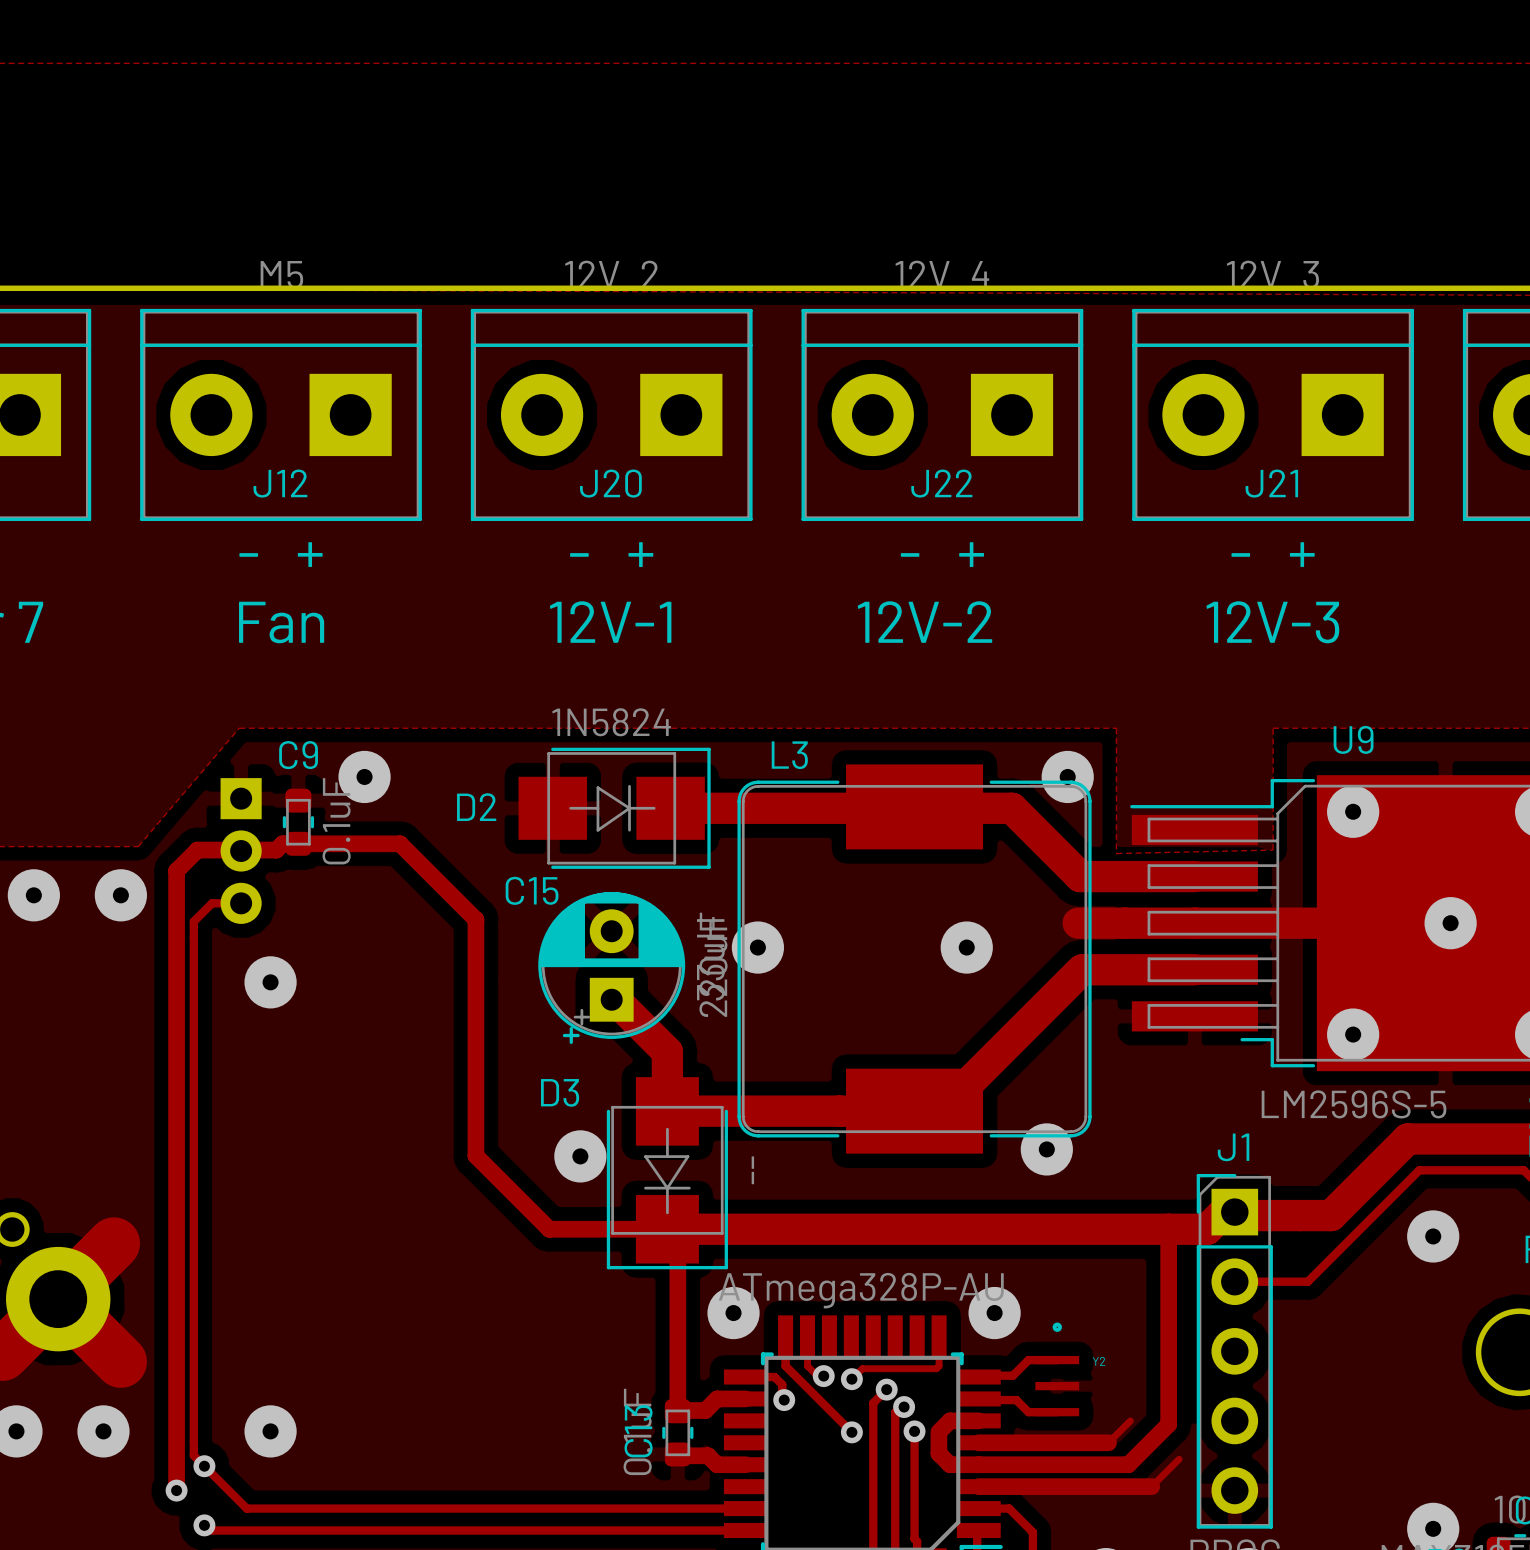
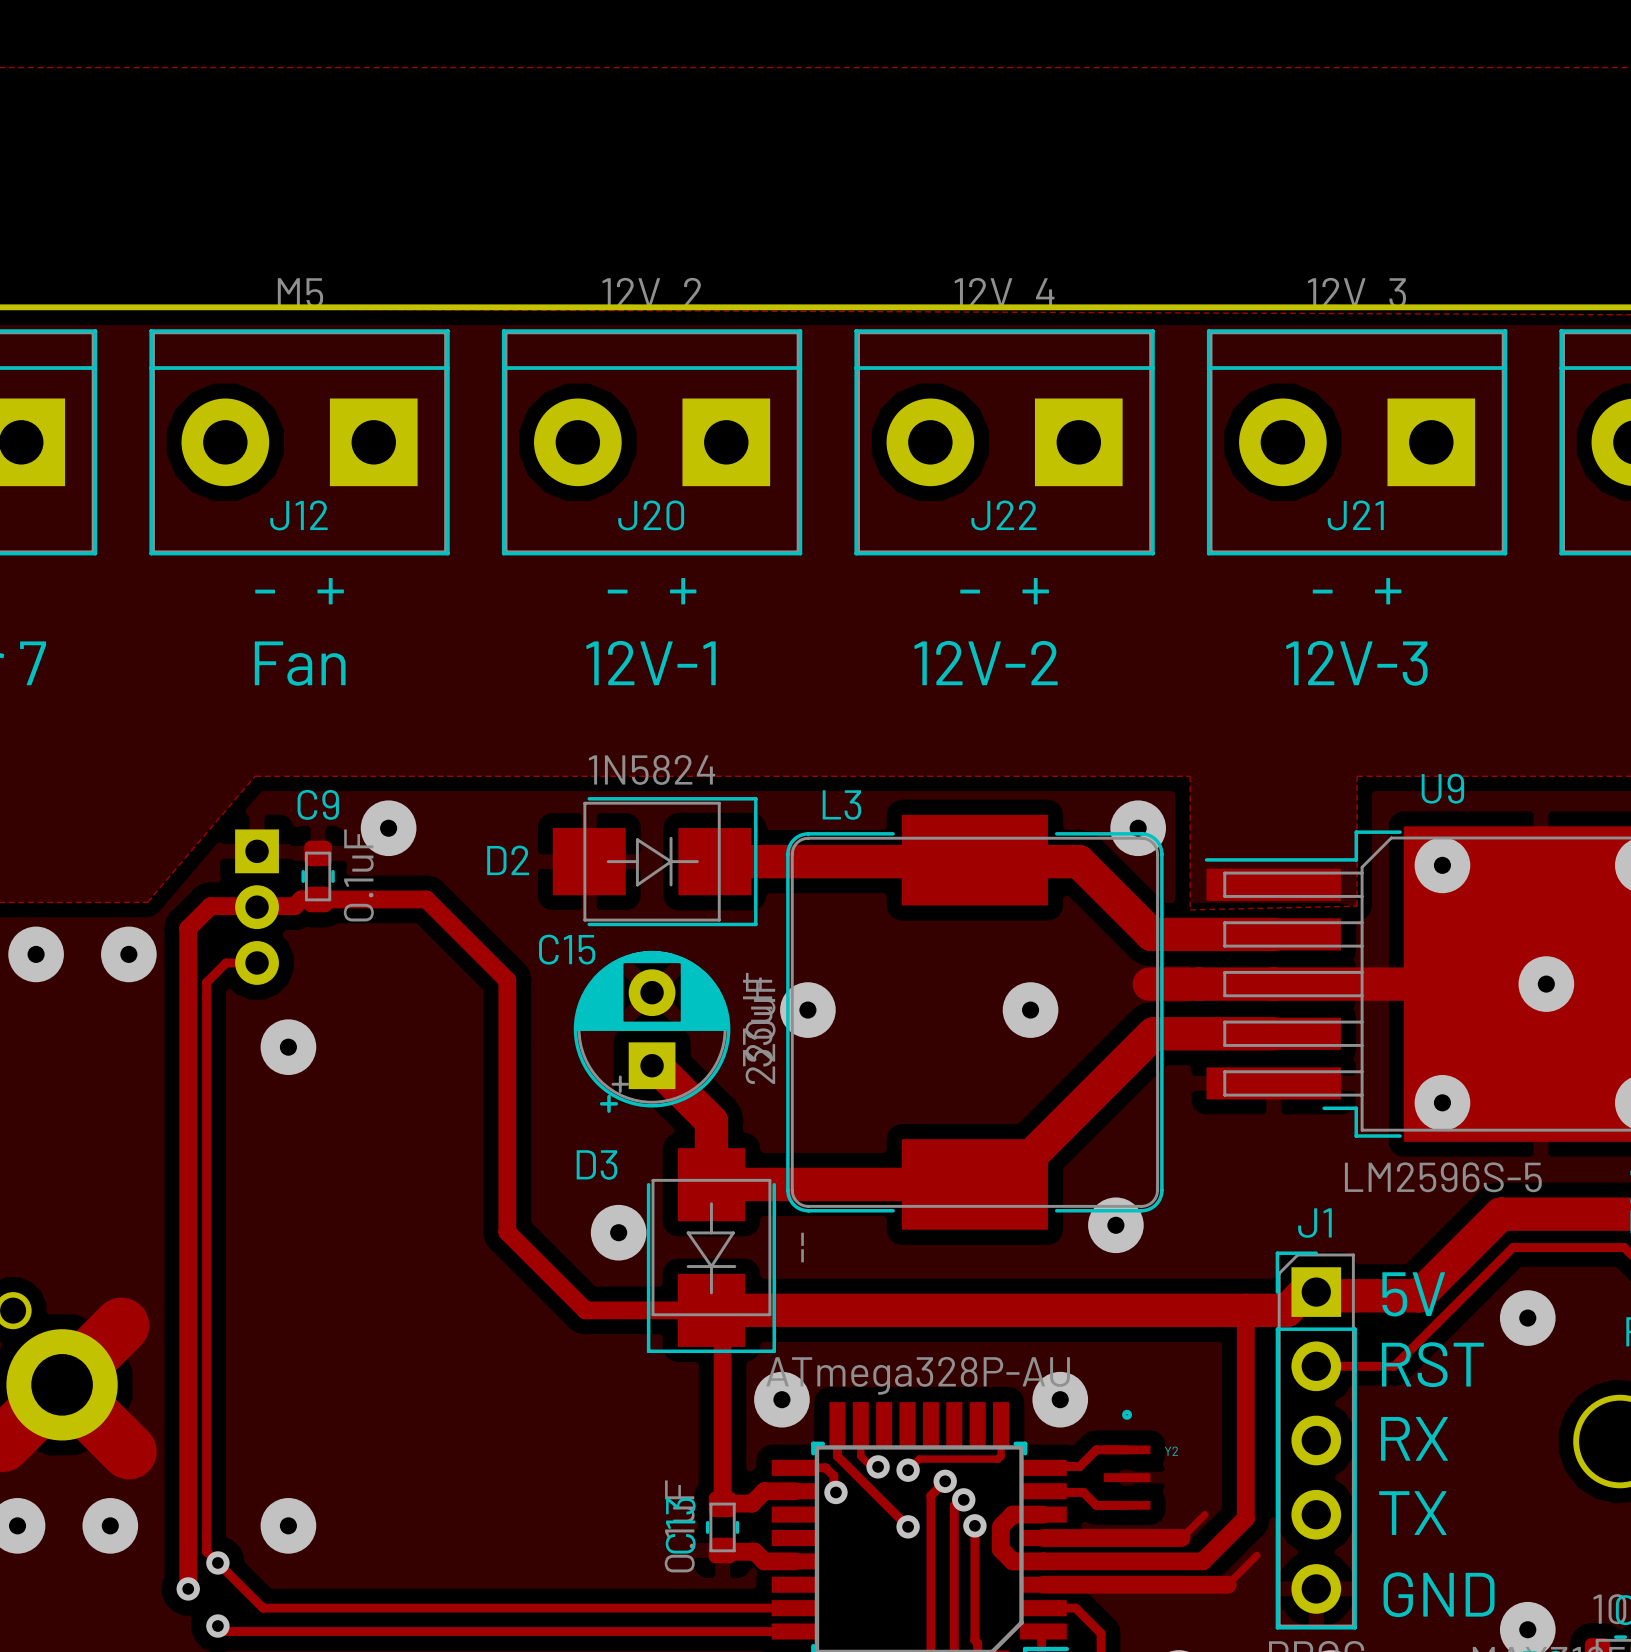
text: none -> 5V (1413, 1294)
text: none -> RST (1432, 1364)
text: none -> RX (1414, 1438)
text: none -> TX (1412, 1513)
text: none -> GND (1439, 1594)

